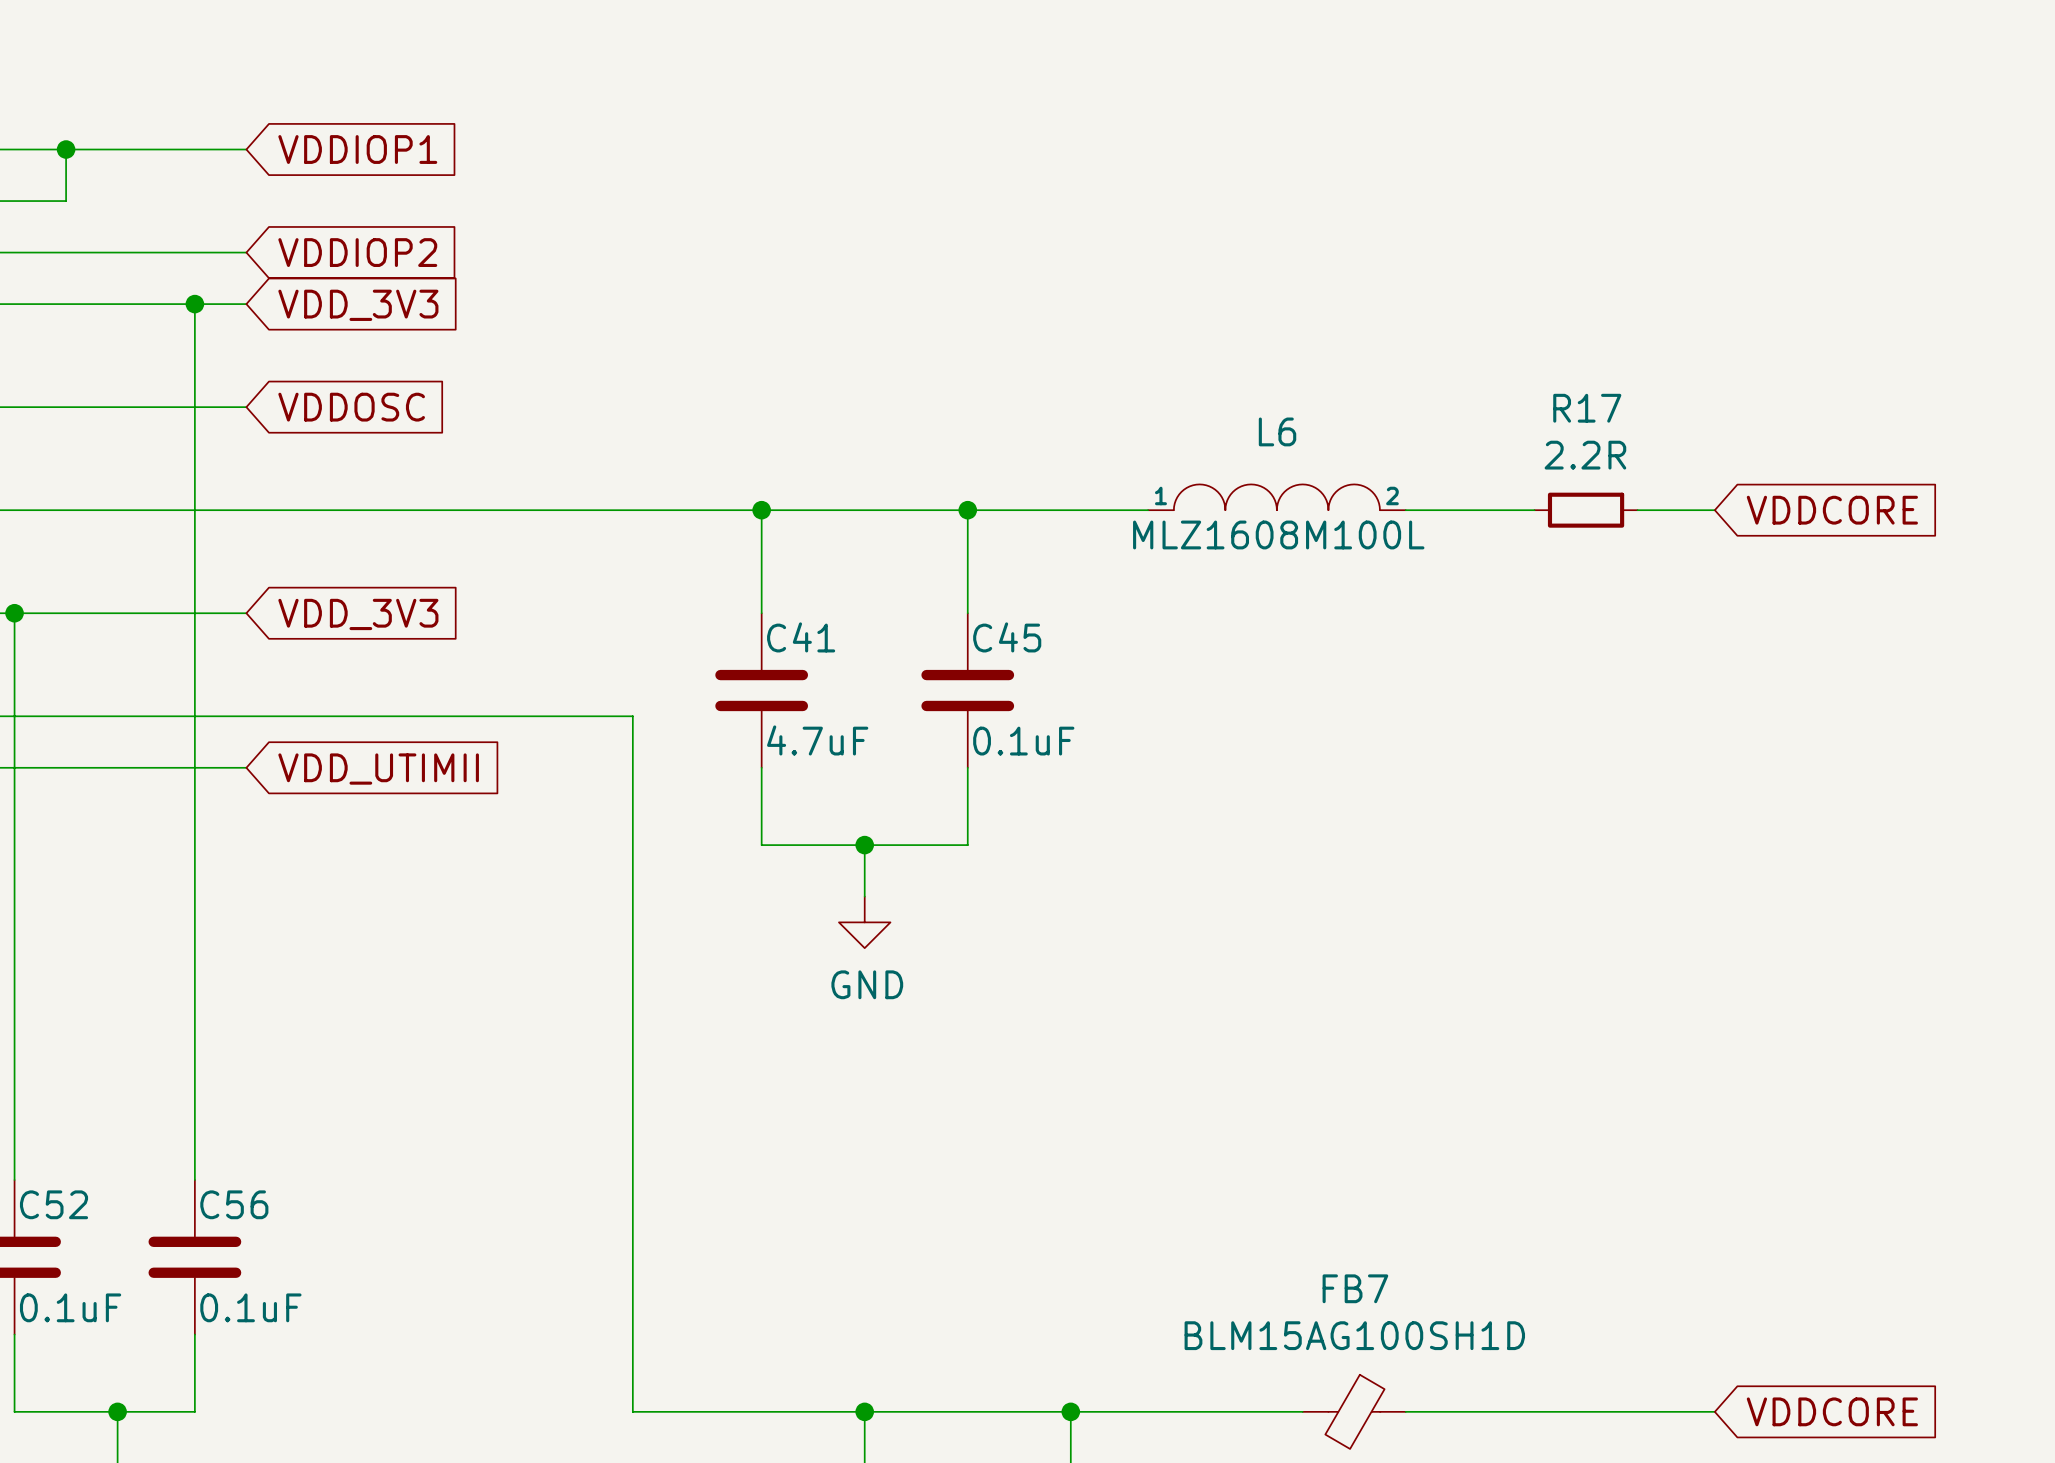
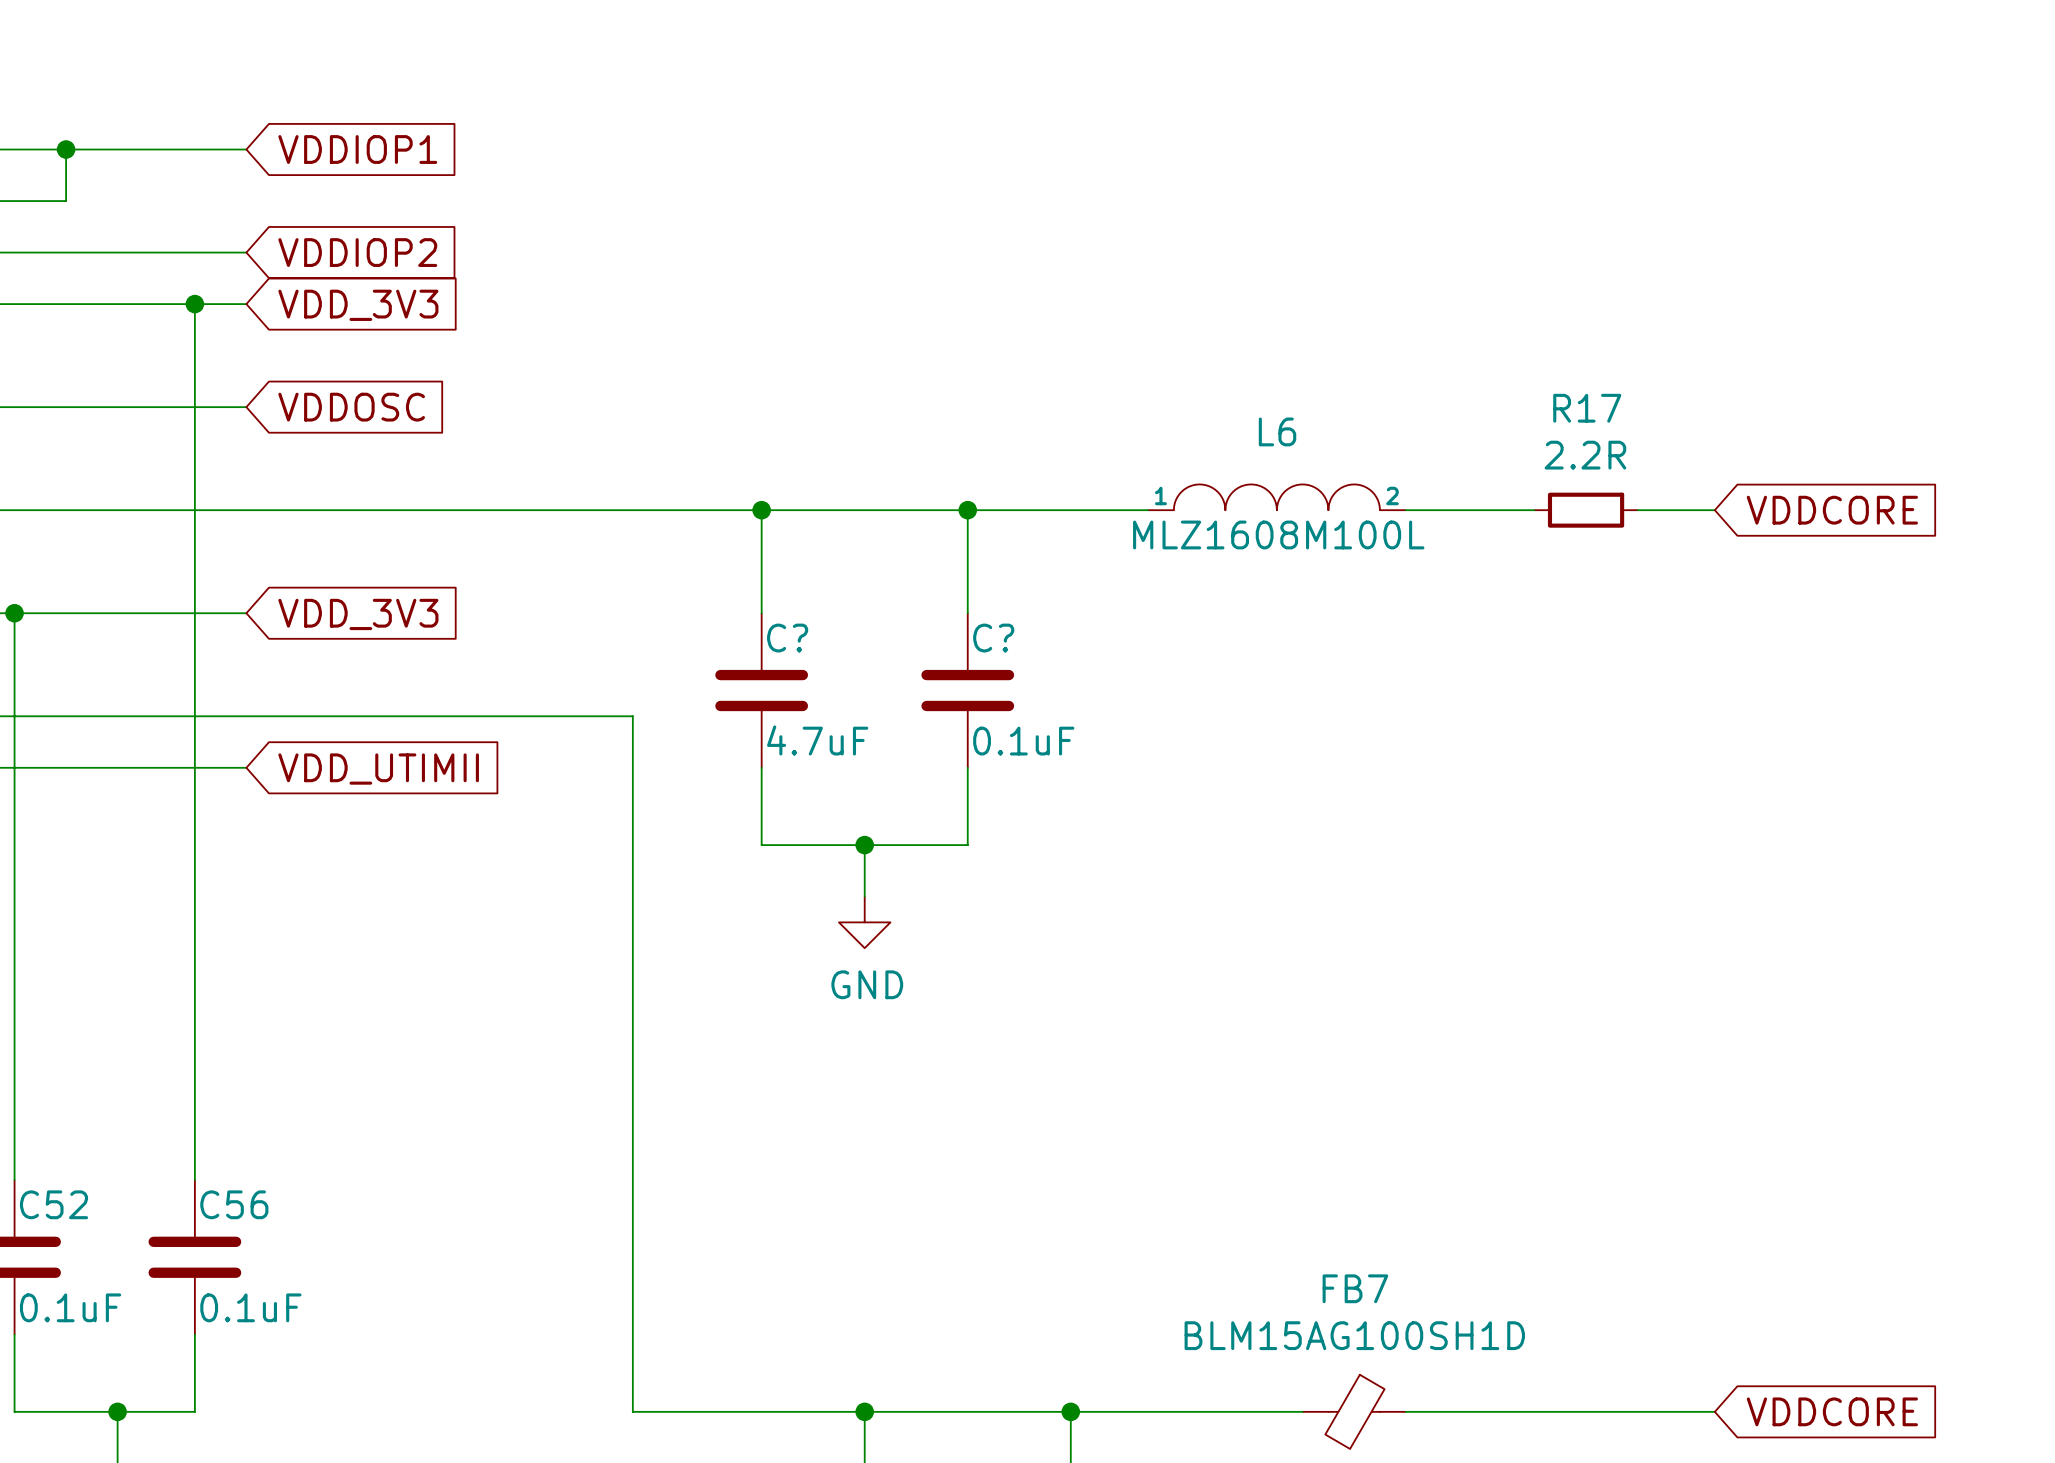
C41 name: C41 (801, 637) -> C? (787, 638)
C45 name: C45 (1007, 637) -> C? (993, 638)

